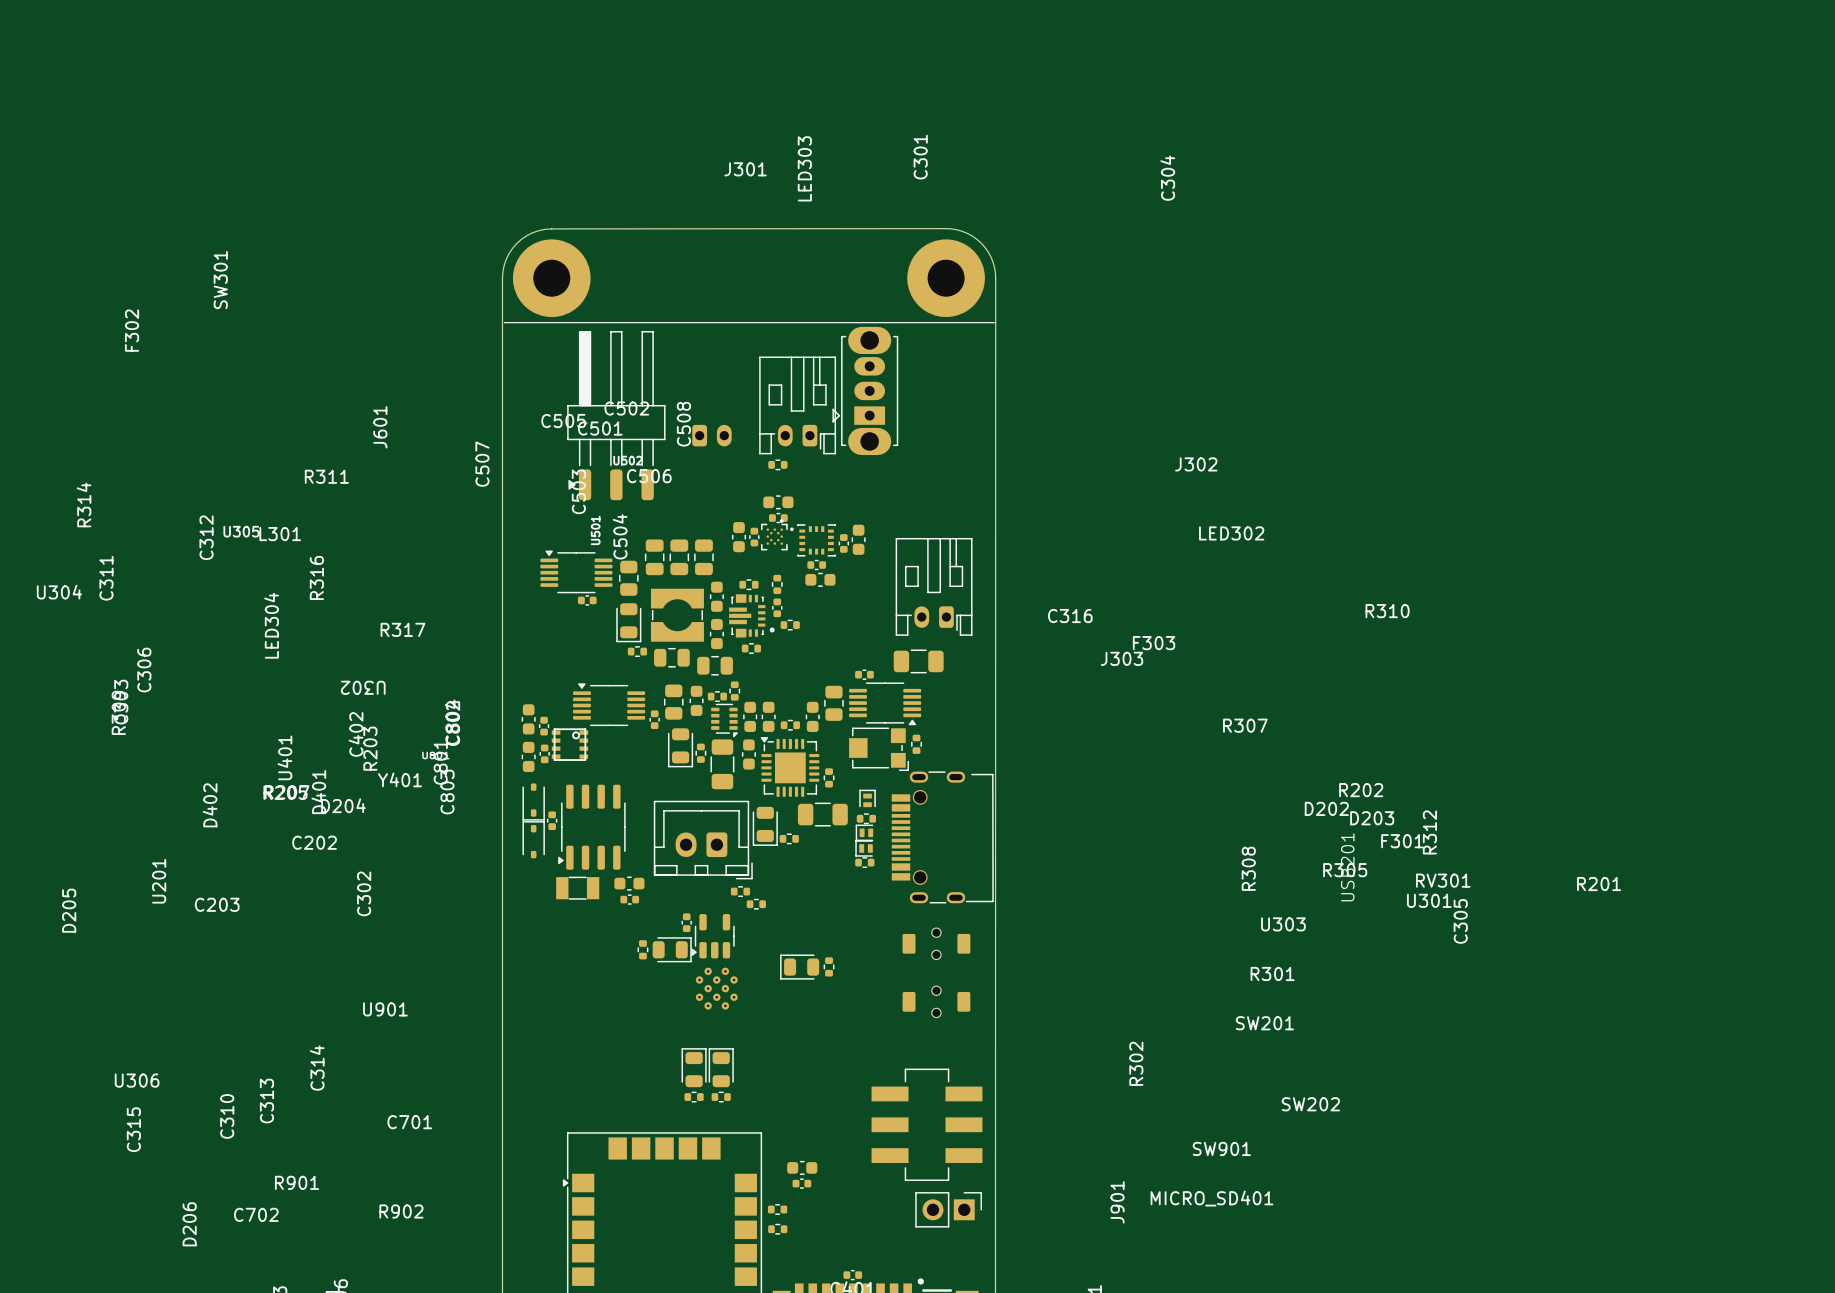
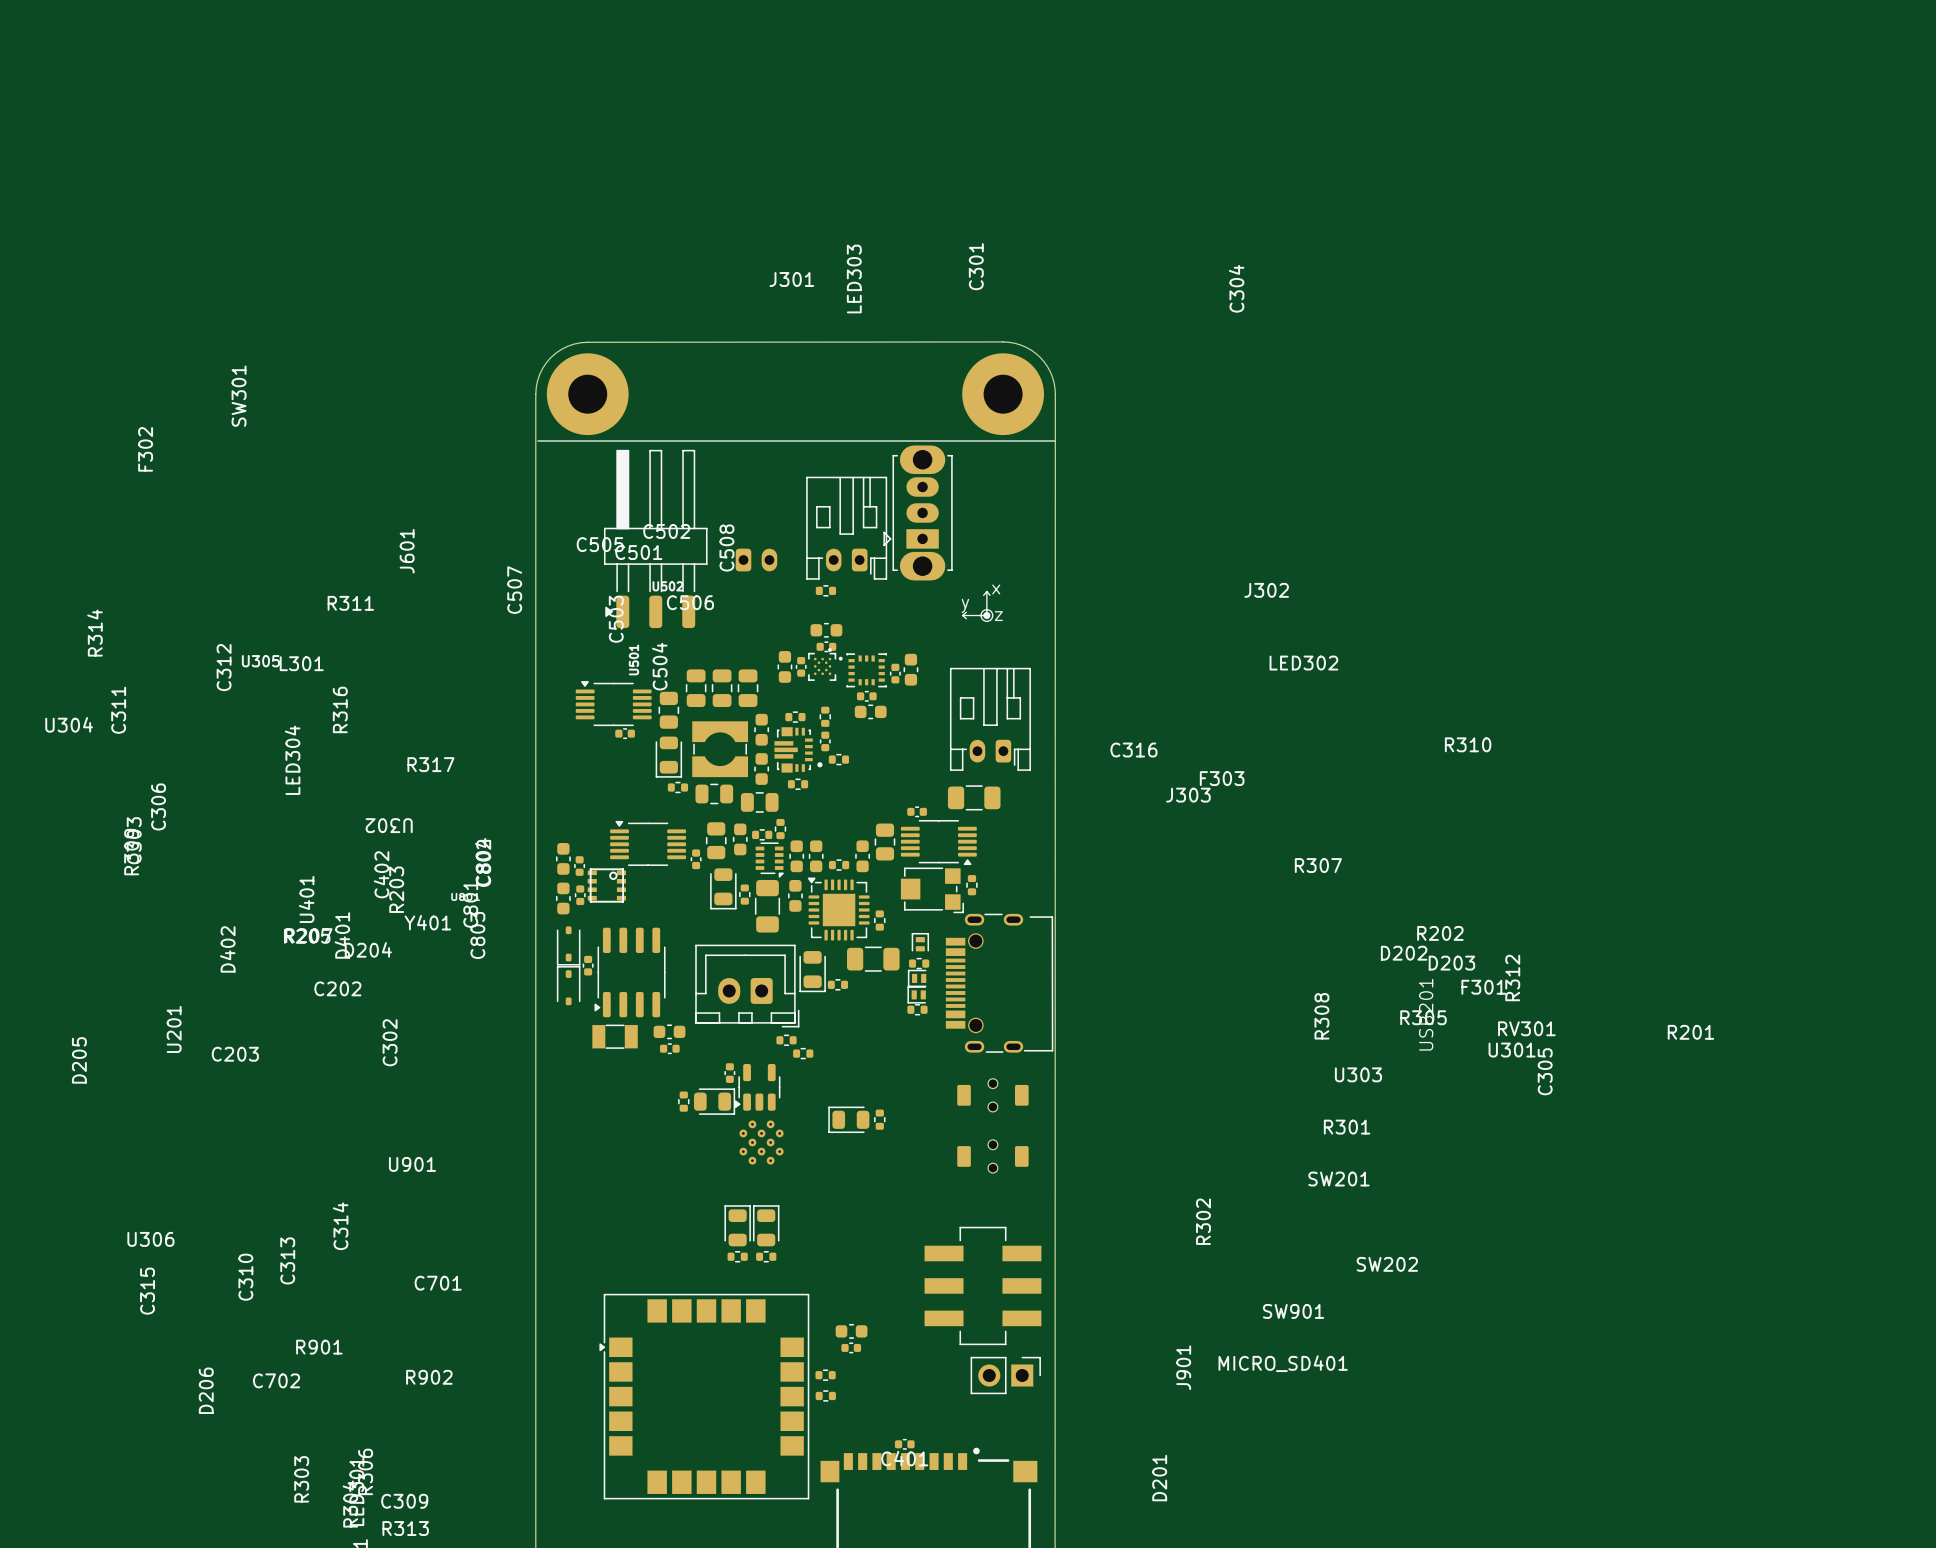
text: none -> x (996, 589)
line: none -> (986, 591) (983, 595)
line: none -> (986, 591) (986, 615)
line: none -> (986, 591) (990, 595)
text: none -> y (965, 605)
drawing: none -> [980, 609, 994, 623]
line: none -> (966, 612) (962, 615)
line: none -> (962, 615) (986, 615)
line: none -> (962, 615) (966, 618)
text: none -> z (998, 616)

